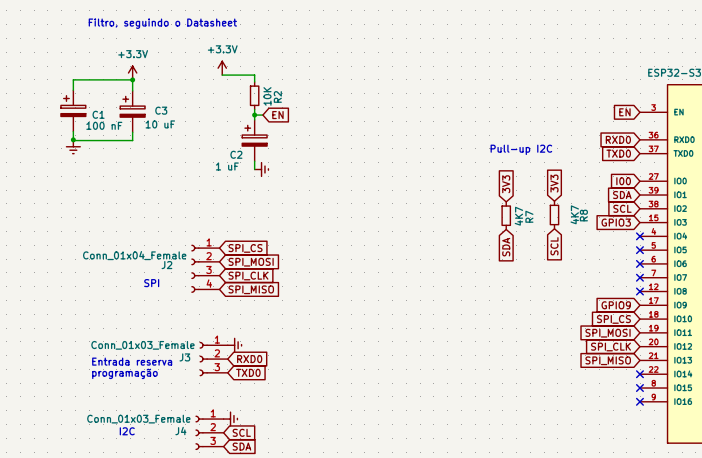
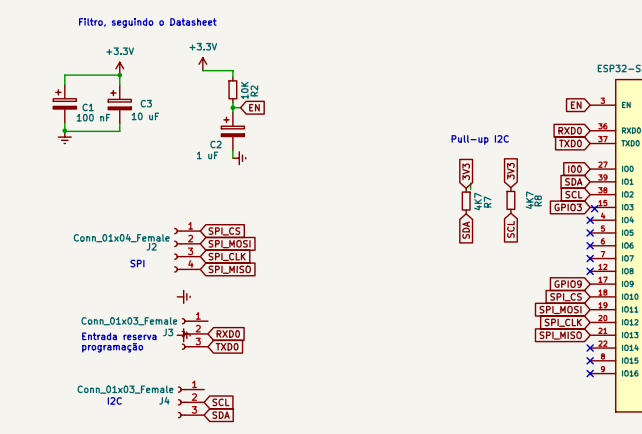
wire: none -> (470, 183) (470, 189)
no-connect mark: none -> (594, 208)
power symbol: none -> (183, 296)
power symbol: (234, 345) -> none
power symbol: none -> (183, 335)
power symbol: (230, 419) -> none

